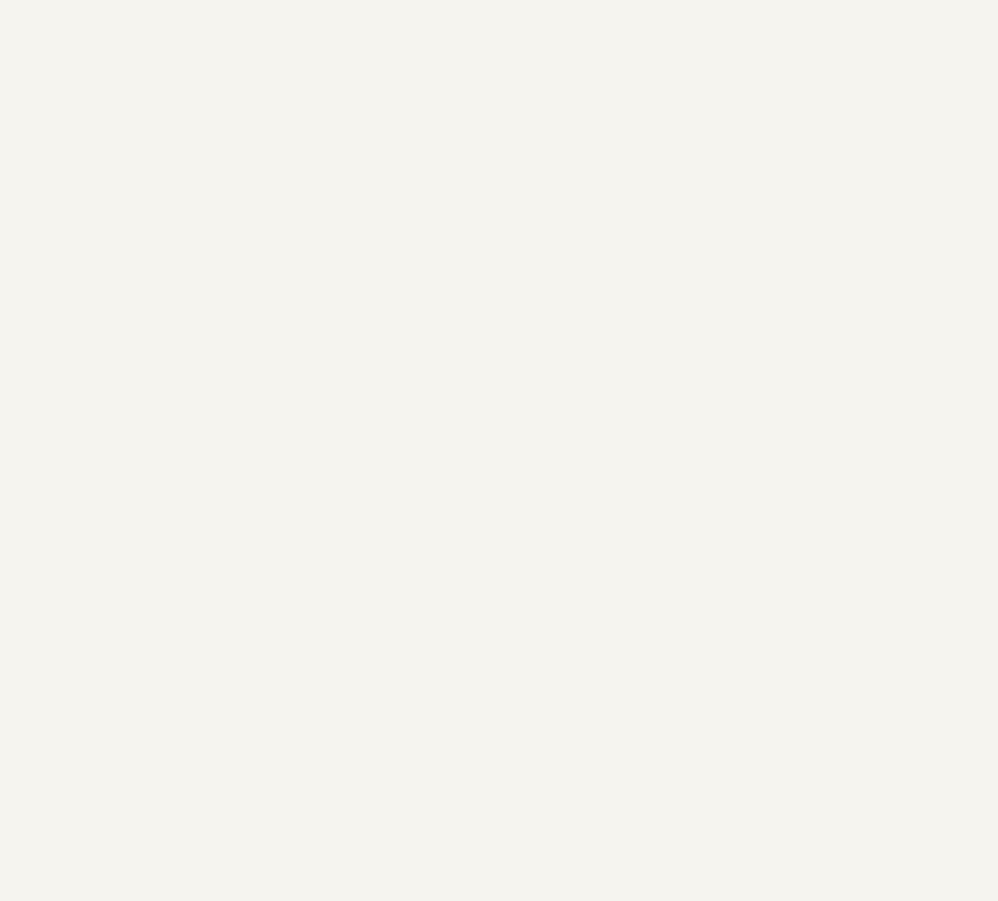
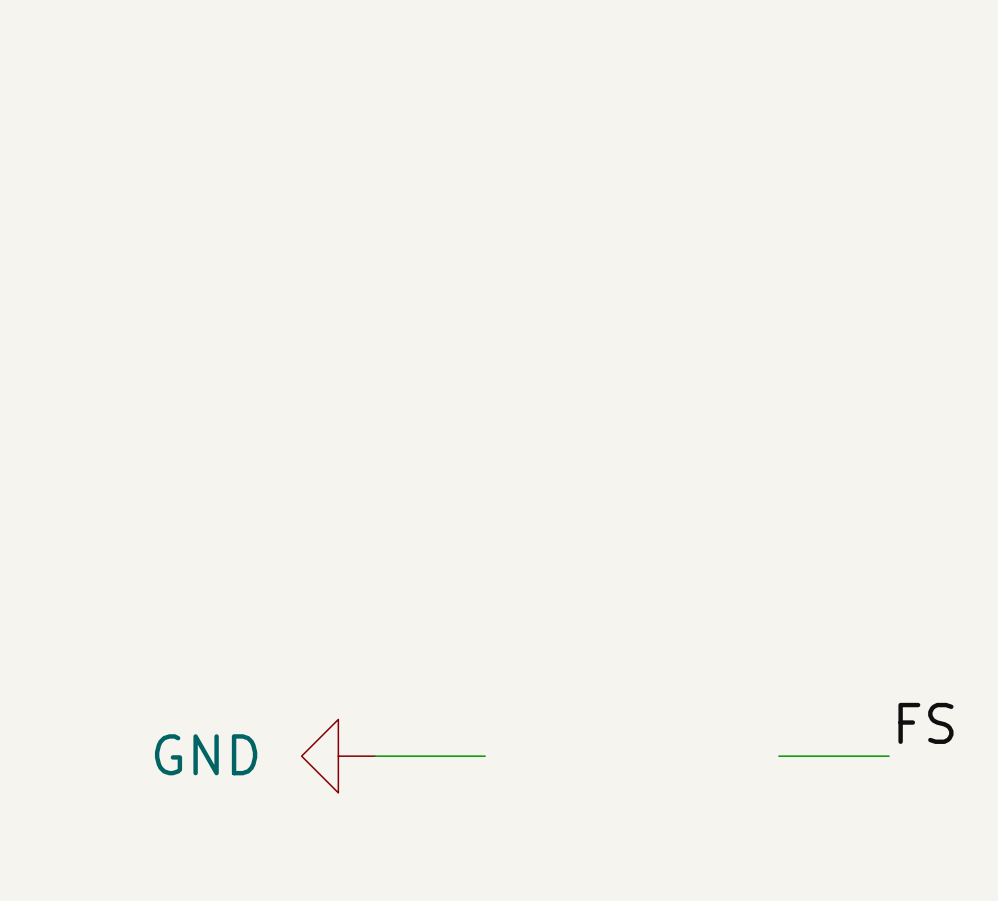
label: none -> FS (925, 723)
power symbol: none -> GND (338, 756)
wire: none -> (375, 756) (485, 756)
wire: none -> (778, 756) (888, 756)

